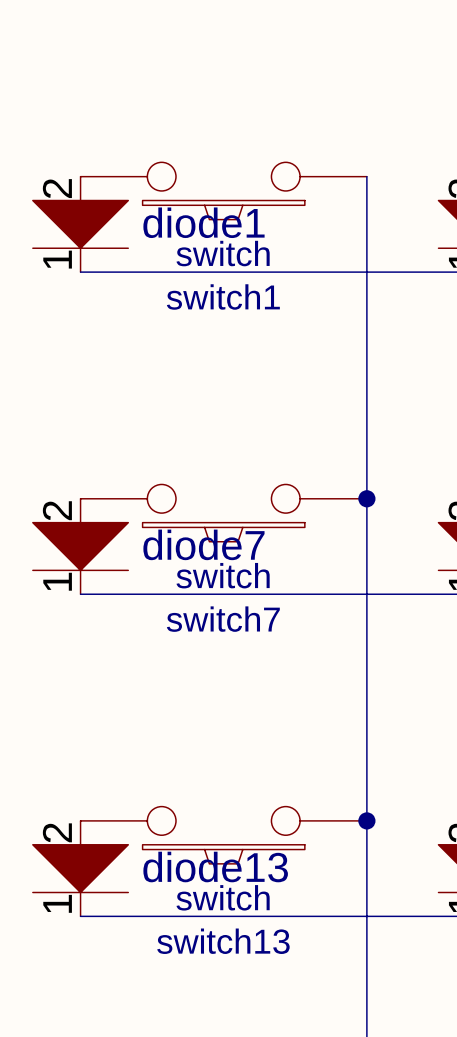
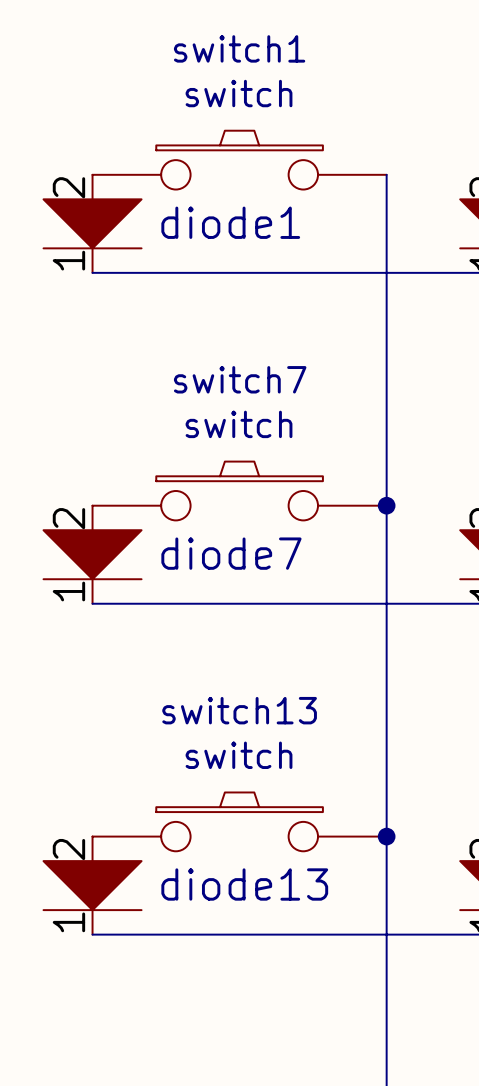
switch1 rotation: 0° (223, 210) -> 180° (239, 140)
switch7 rotation: 0° (223, 532) -> 180° (239, 471)
switch13 rotation: 0° (223, 854) -> 180° (239, 802)

